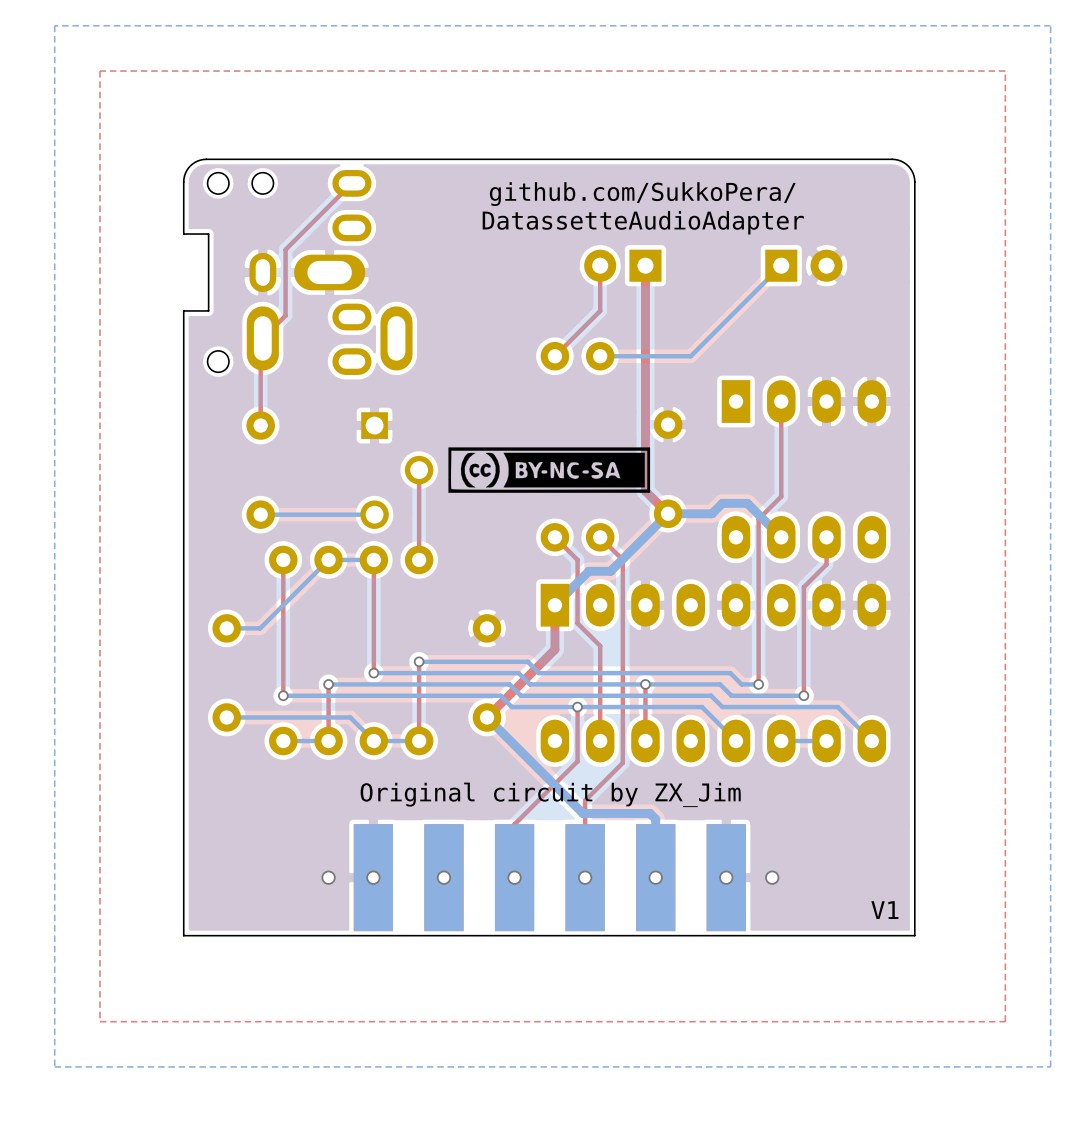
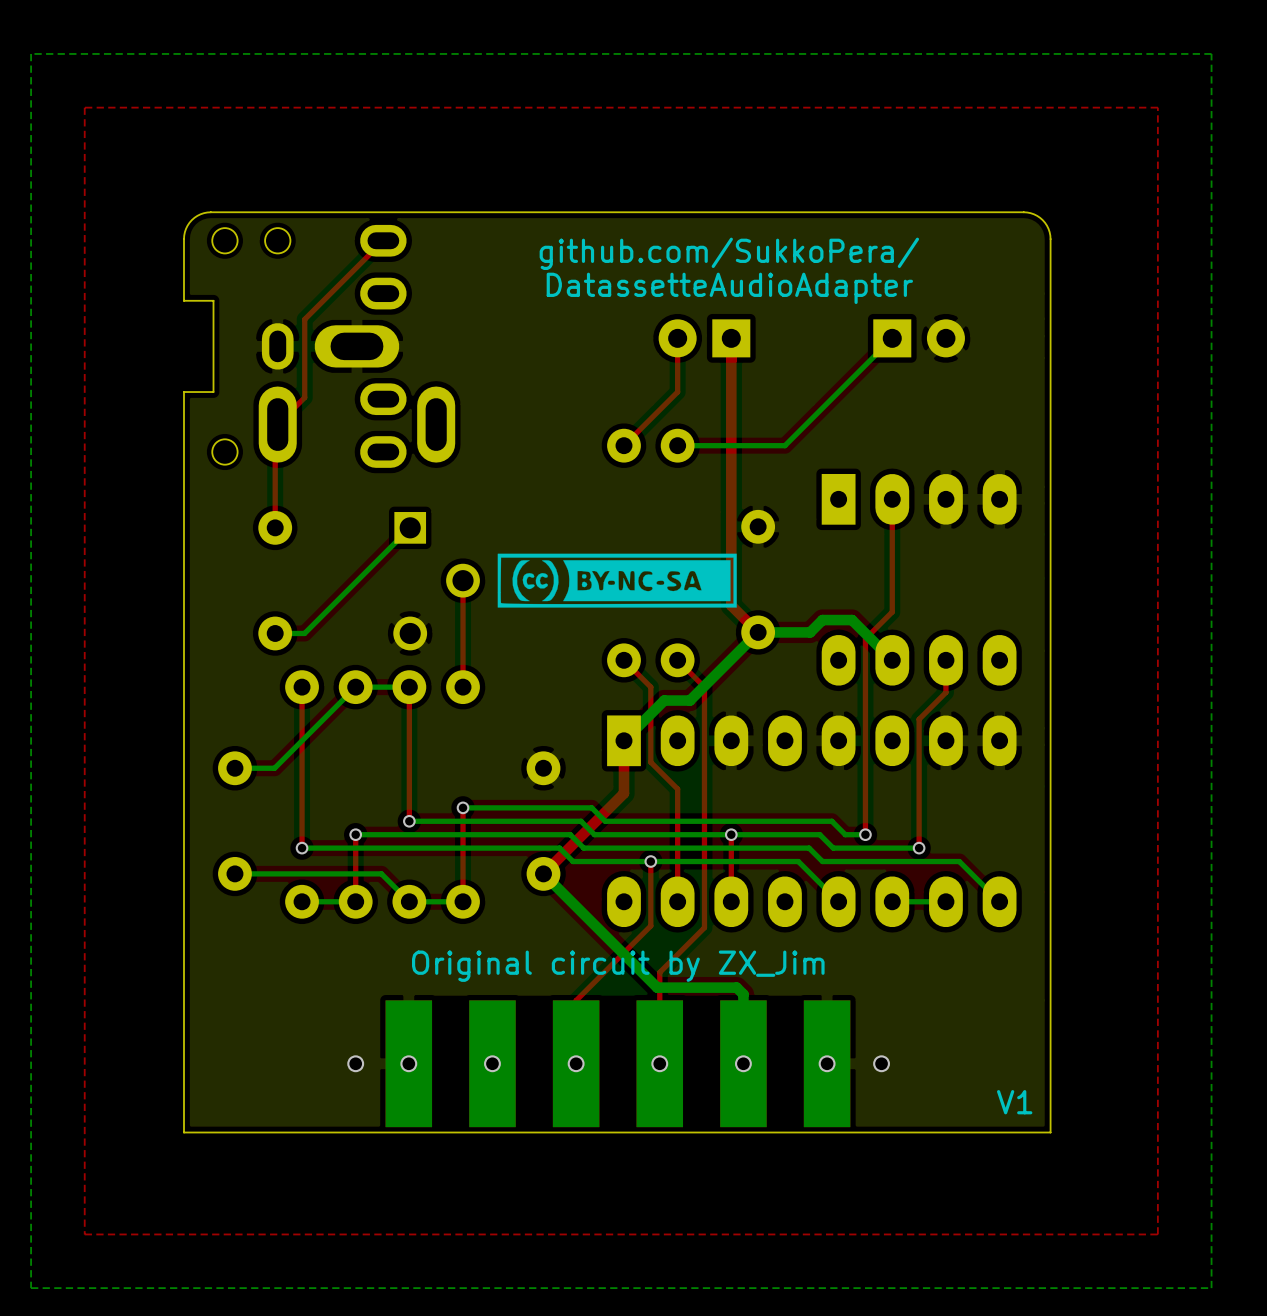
bottom track: (374, 514) (285, 514) -> (410, 527) (304, 633)

